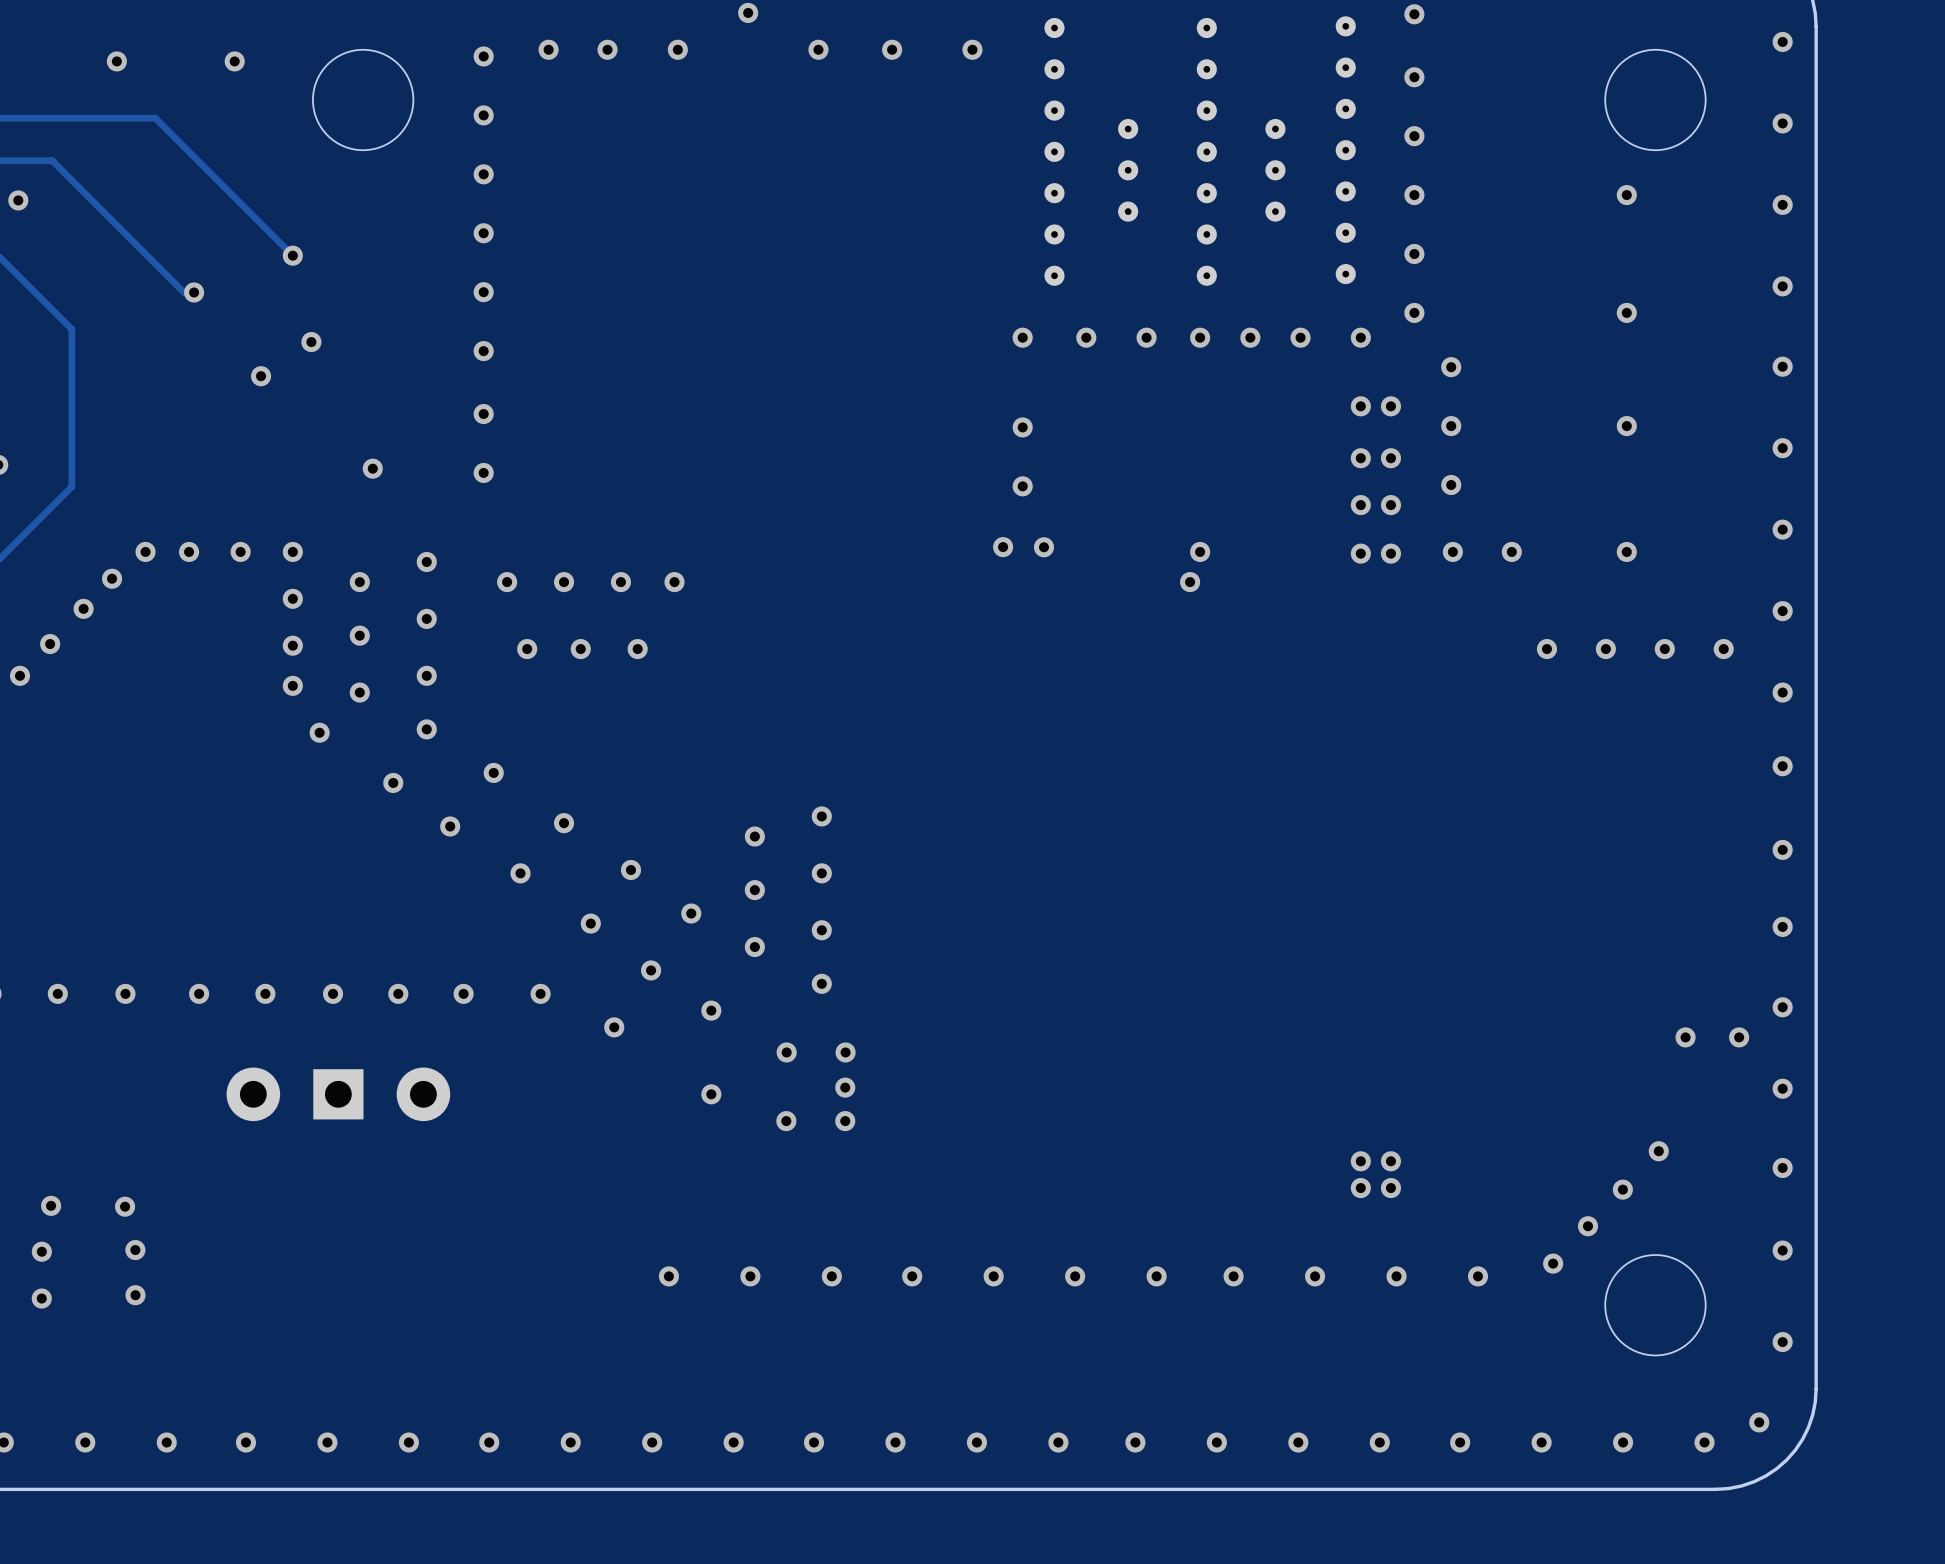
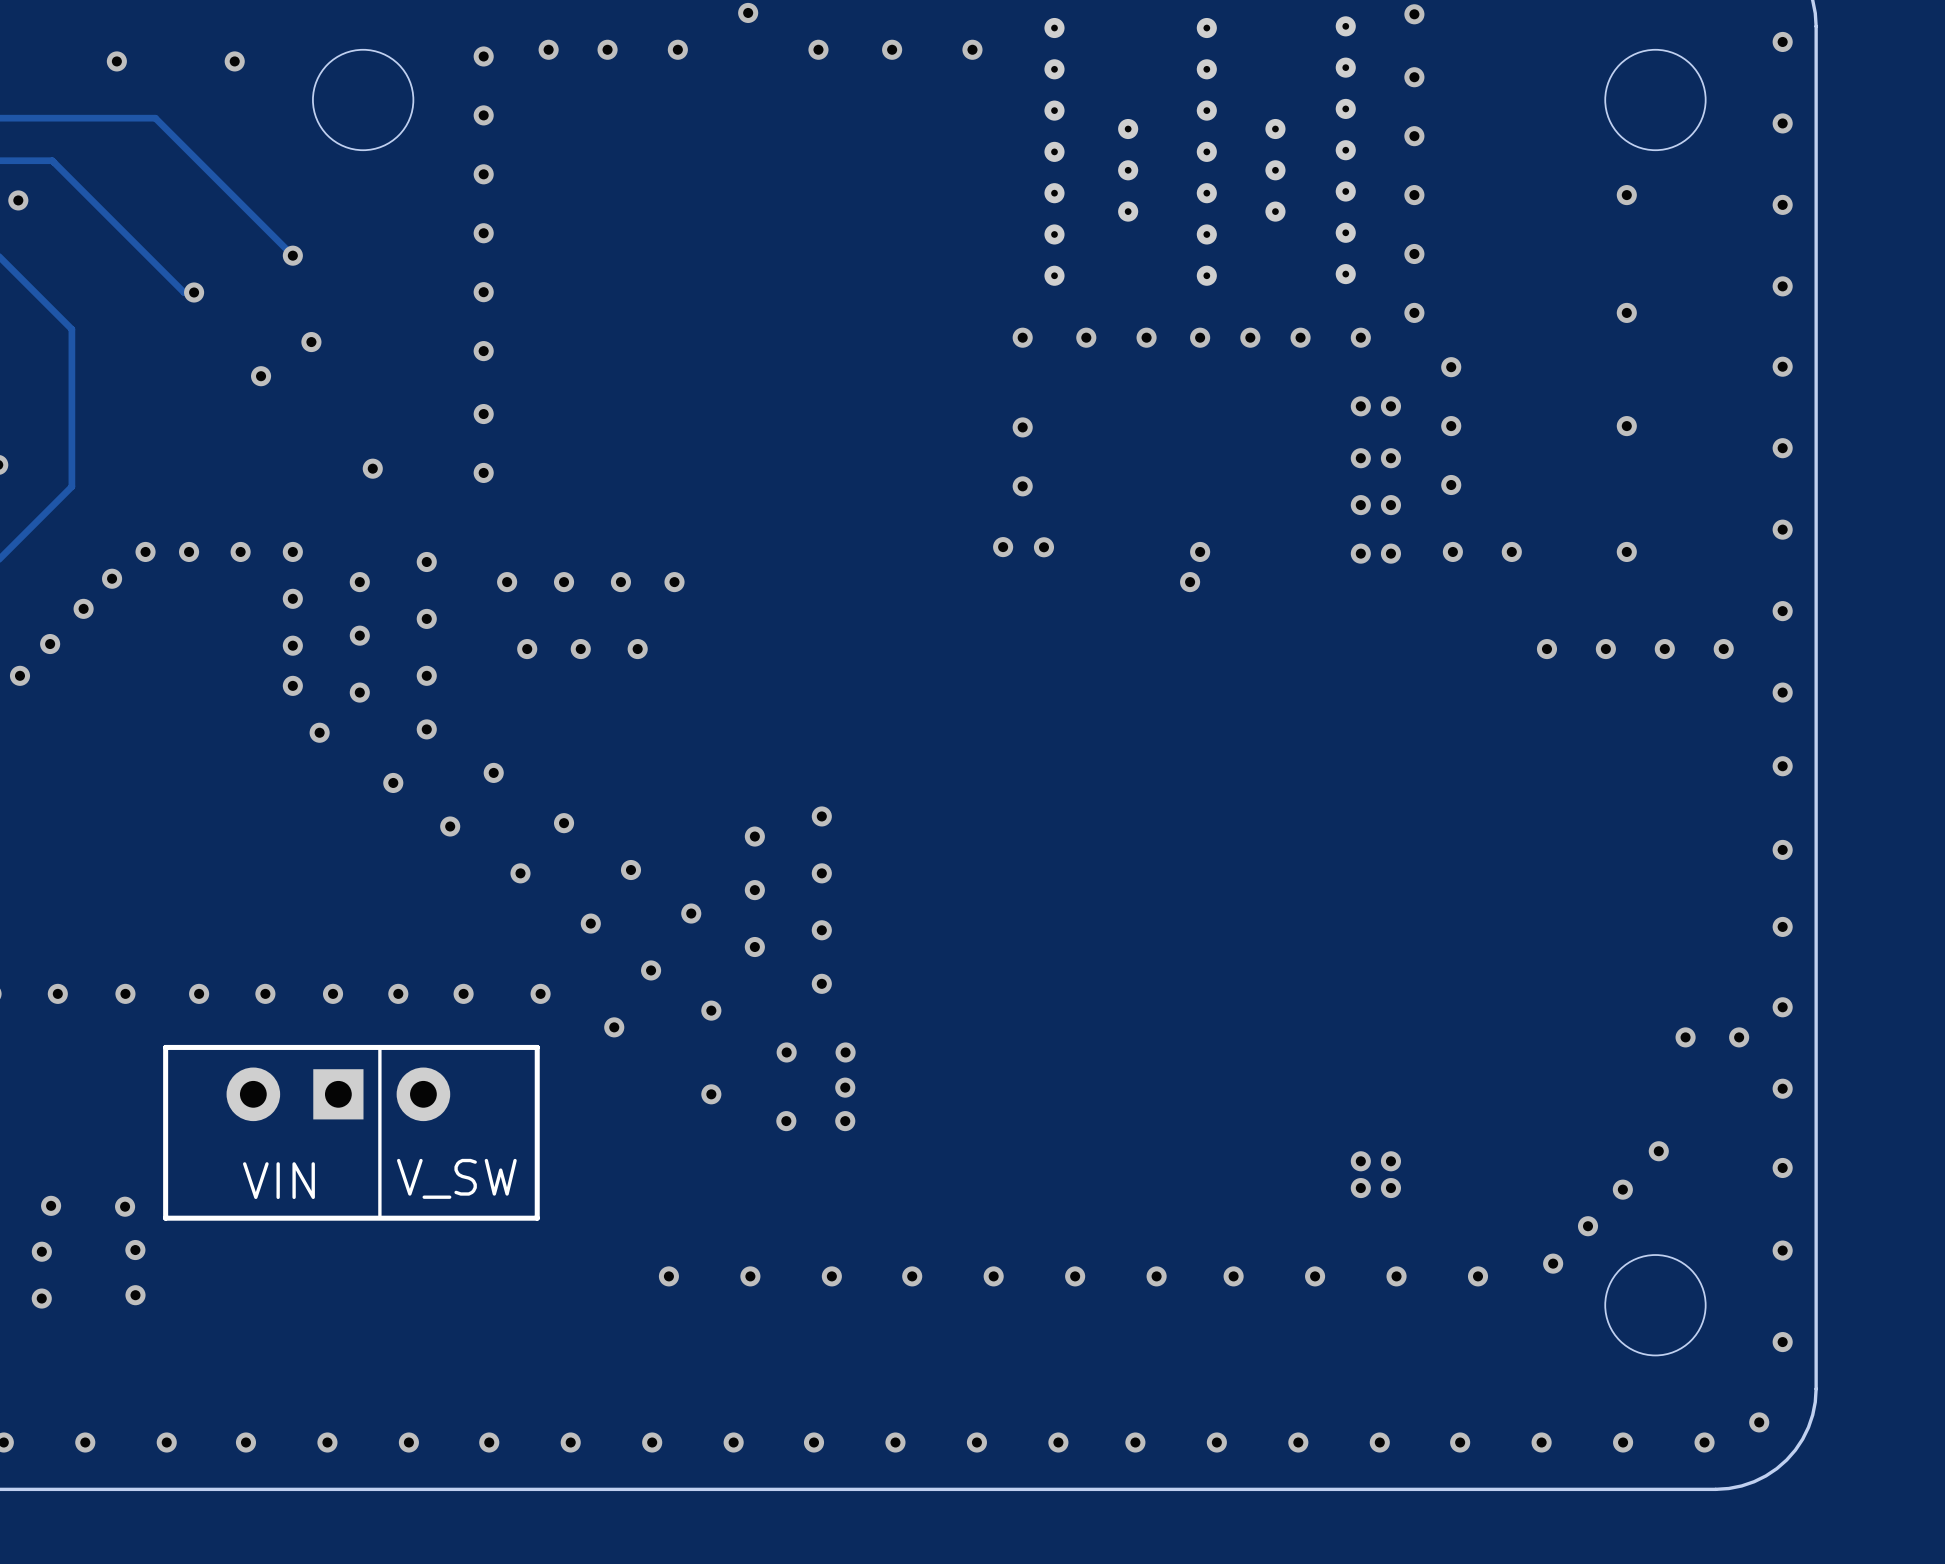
line: none -> (379, 1047) (379, 1218)
line: none -> (537, 1047) (165, 1047) (165, 1218) (537, 1218) (537, 1047)
text: none -> V_SW (456, 1178)
text: none -> VIN (278, 1180)

